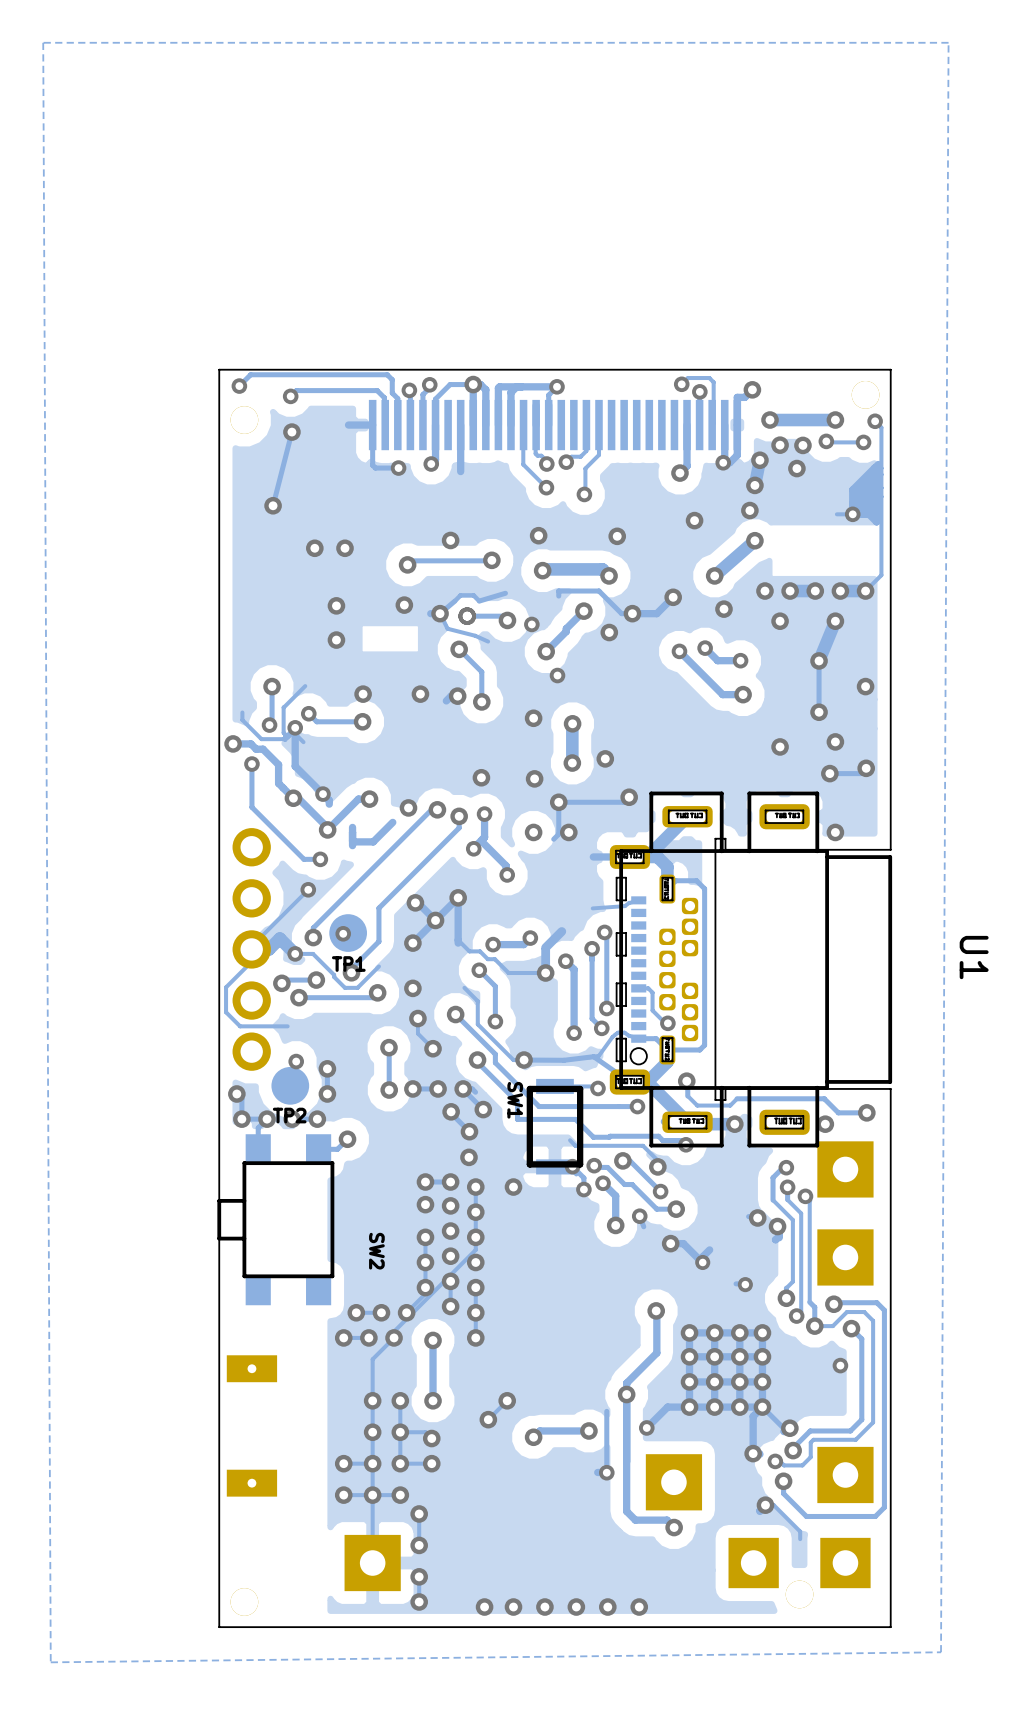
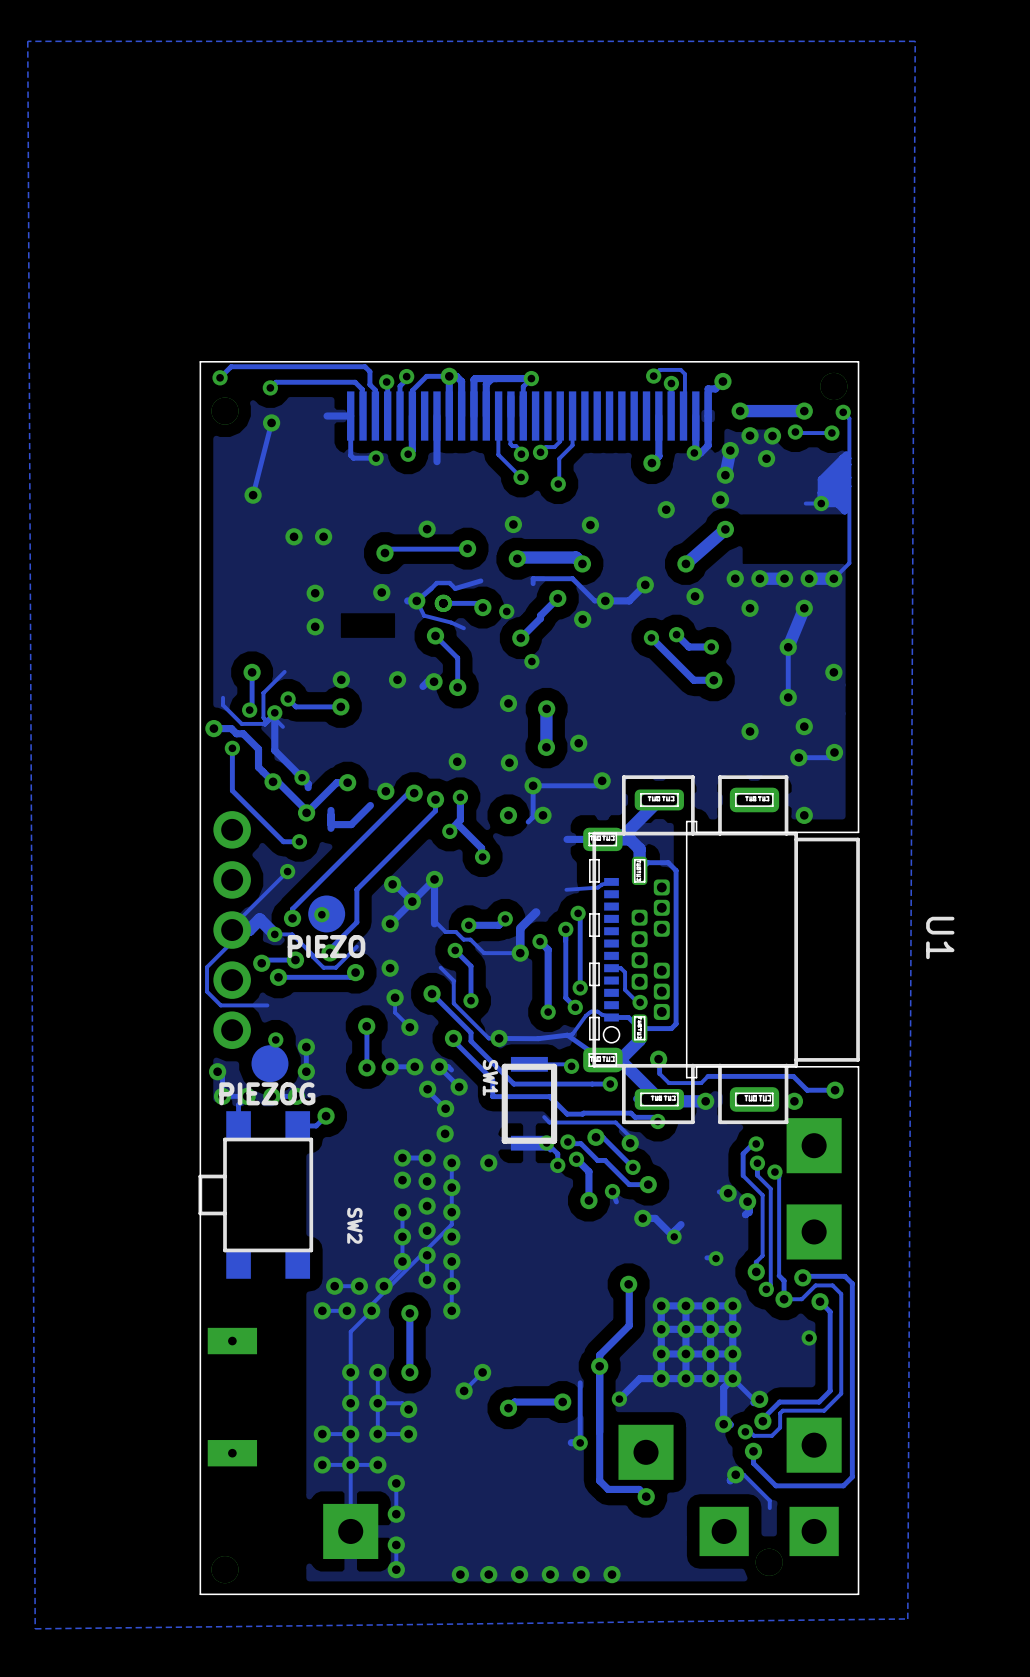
TP1 name: TP1 (348, 964) -> none
text: none -> PIEZO (326, 946)
TP2 name: TP2 (289, 1115) -> none
text: none -> PIEZOG (267, 1093)

